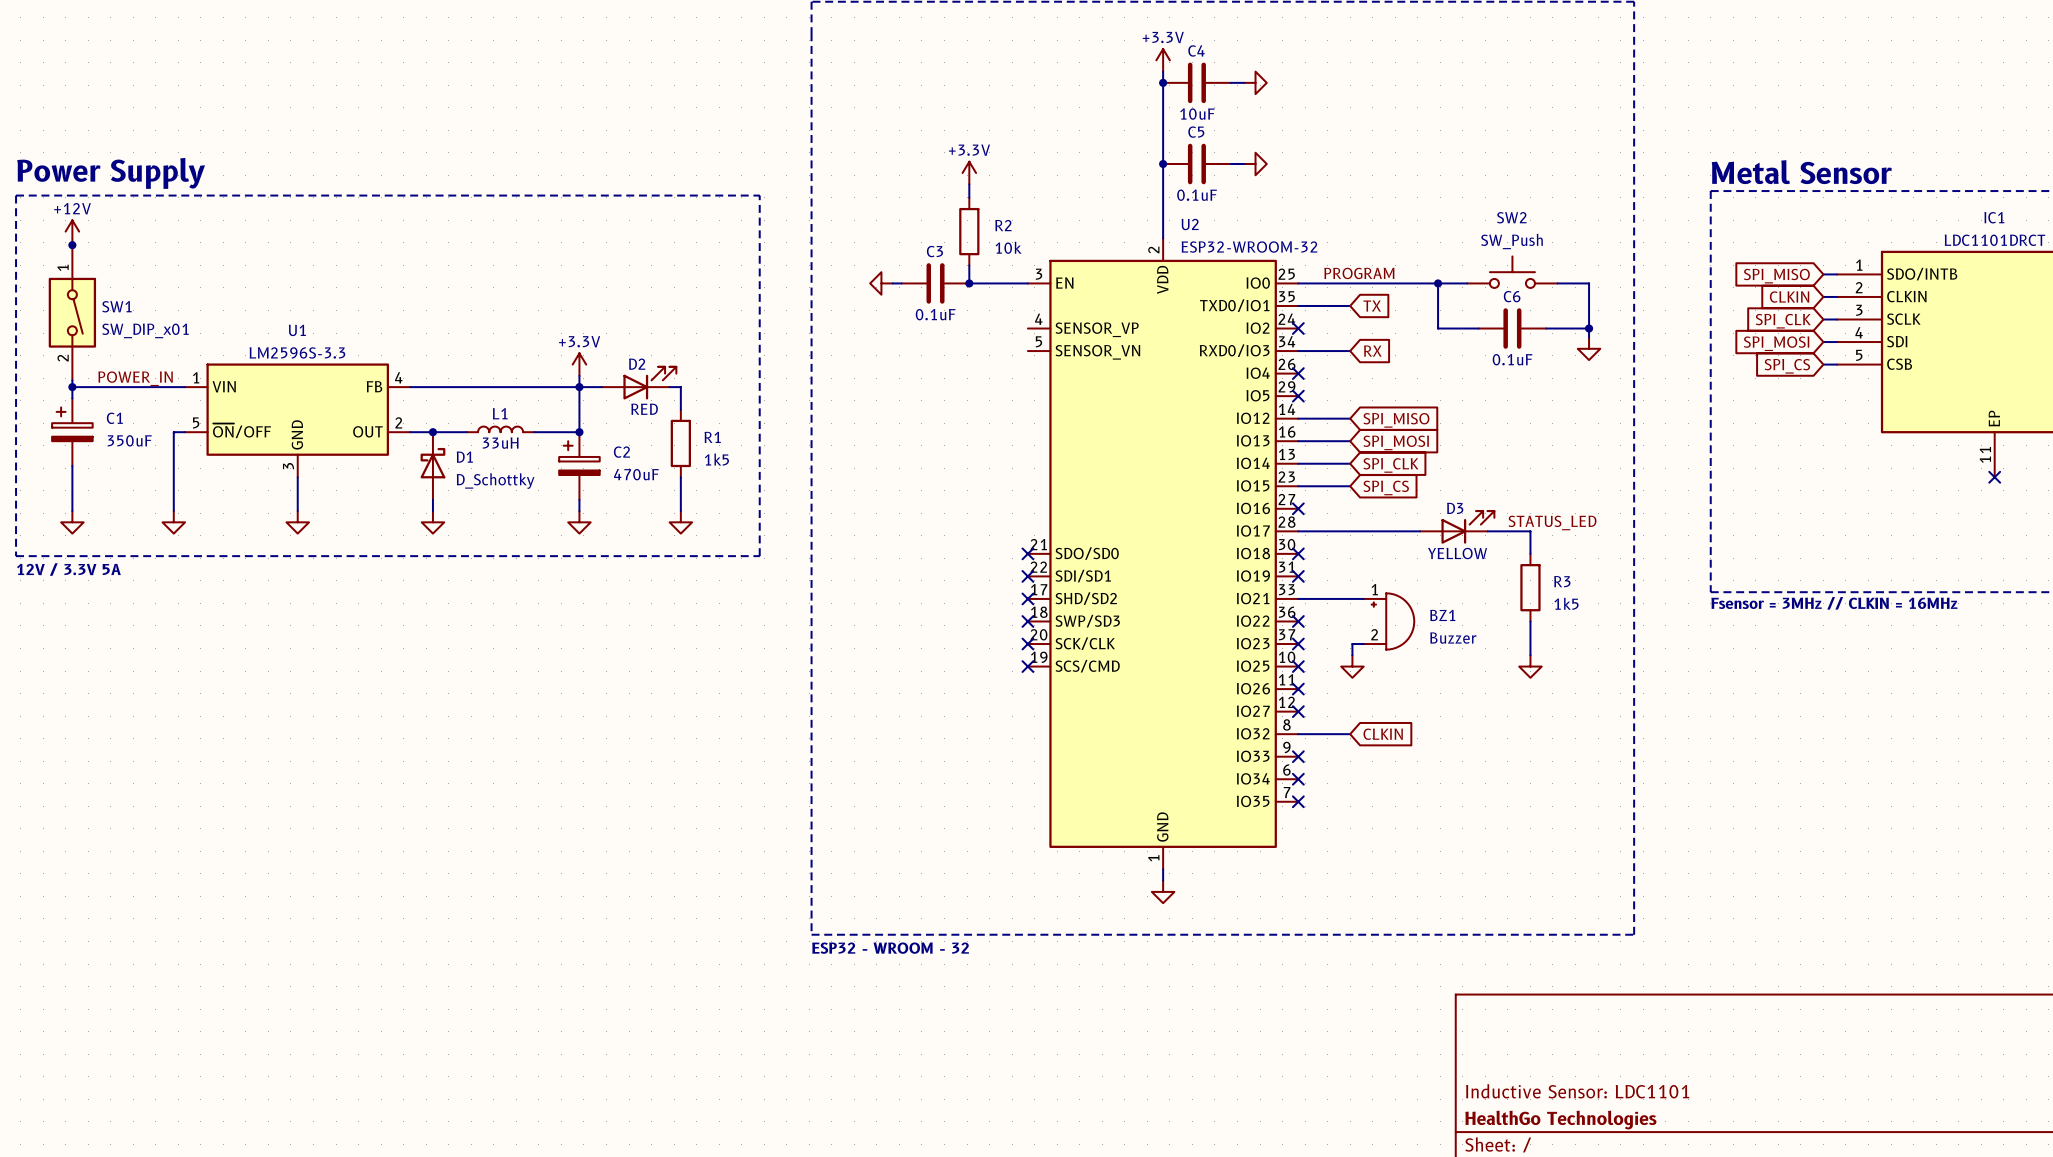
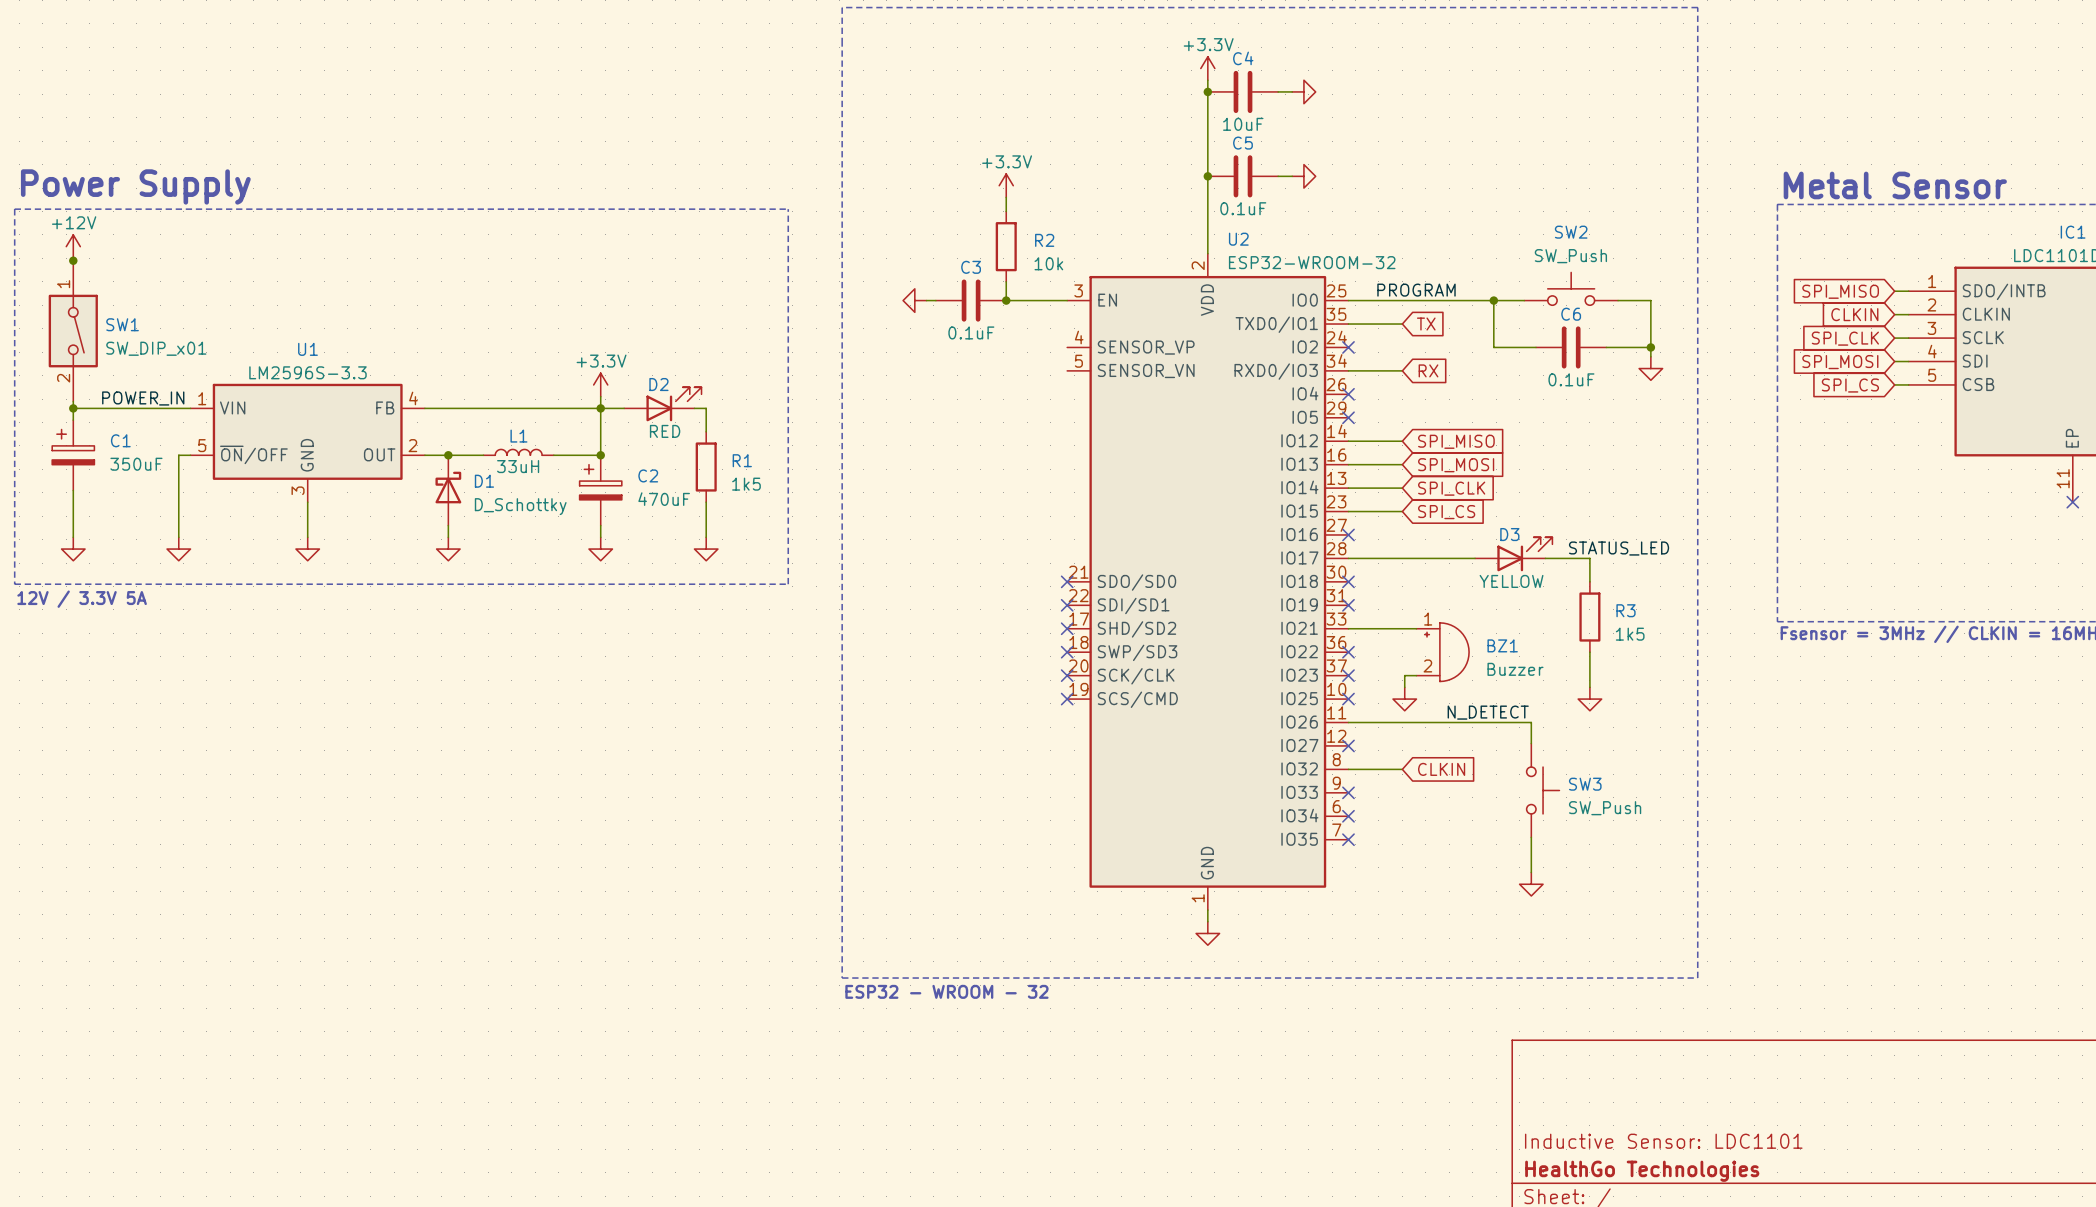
label: none -> N_DETECT (1488, 712)
wire: none -> (1348, 722) (1531, 722) (1531, 743)
no-connect mark: (1298, 689) -> none
SW3: none -> SW_Push (1543, 790)
wire: none -> (1531, 837) (1531, 872)
power symbol: none -> (1531, 884)

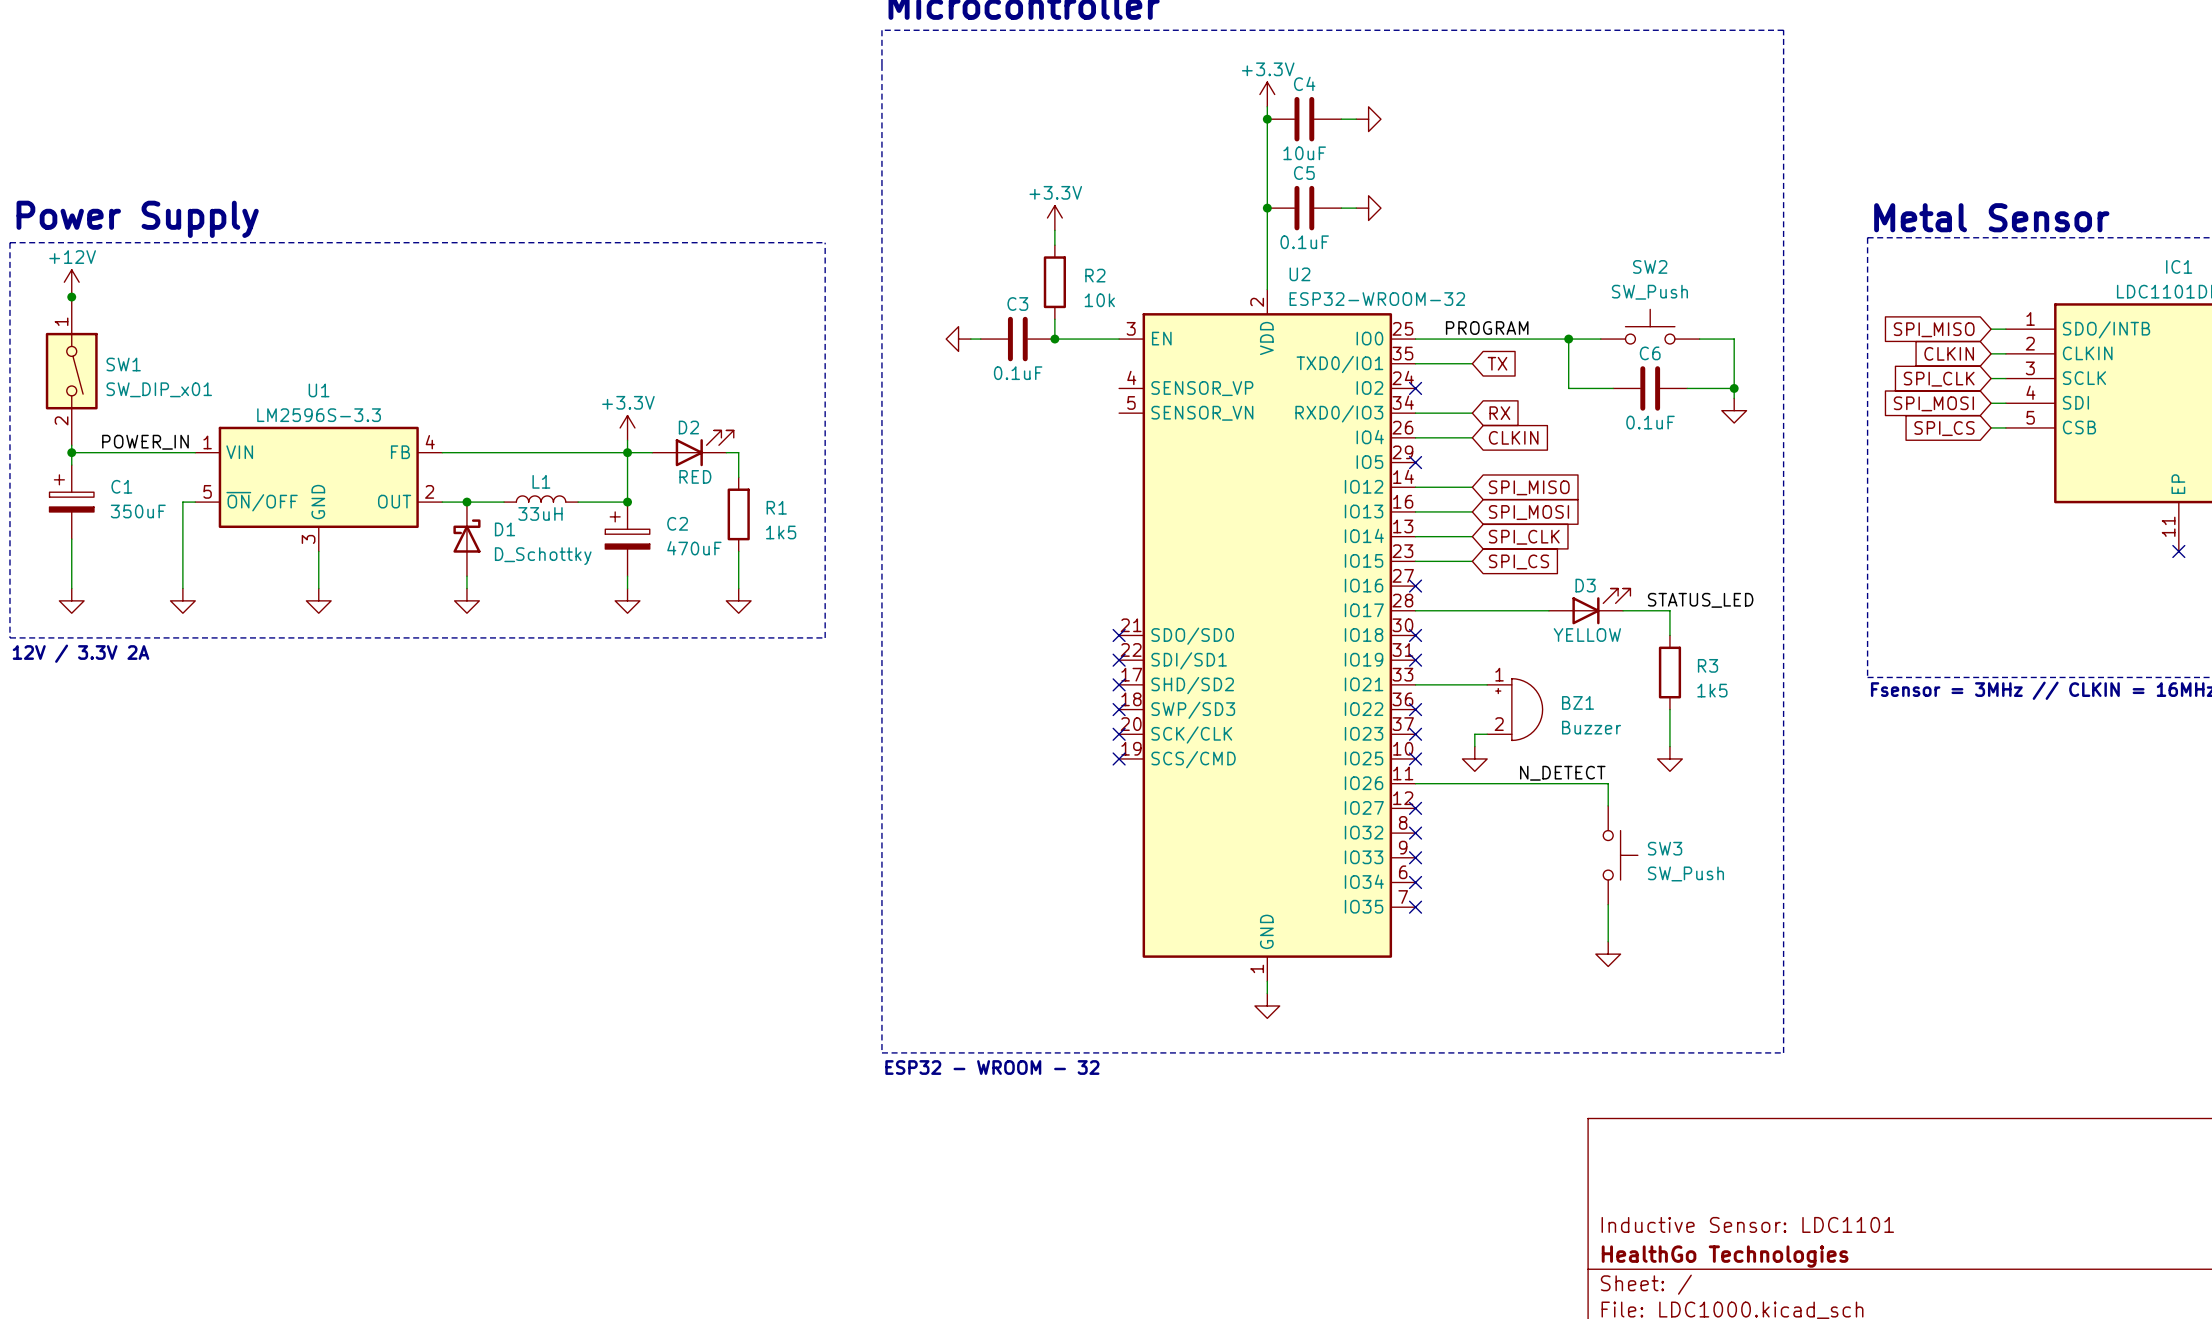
wire: none -> (1415, 437) (1472, 437)
no-connect mark: (1348, 394) -> none
global label: none -> CLKIN (1513, 437)
text: 12V / 3.3V 5A (82, 599) -> 12V / 3.3V 2A (81, 653)
wire: (1348, 769) (1402, 769) -> none
no-connect mark: none -> (1415, 833)
global label: CLKIN (1441, 769) -> none

